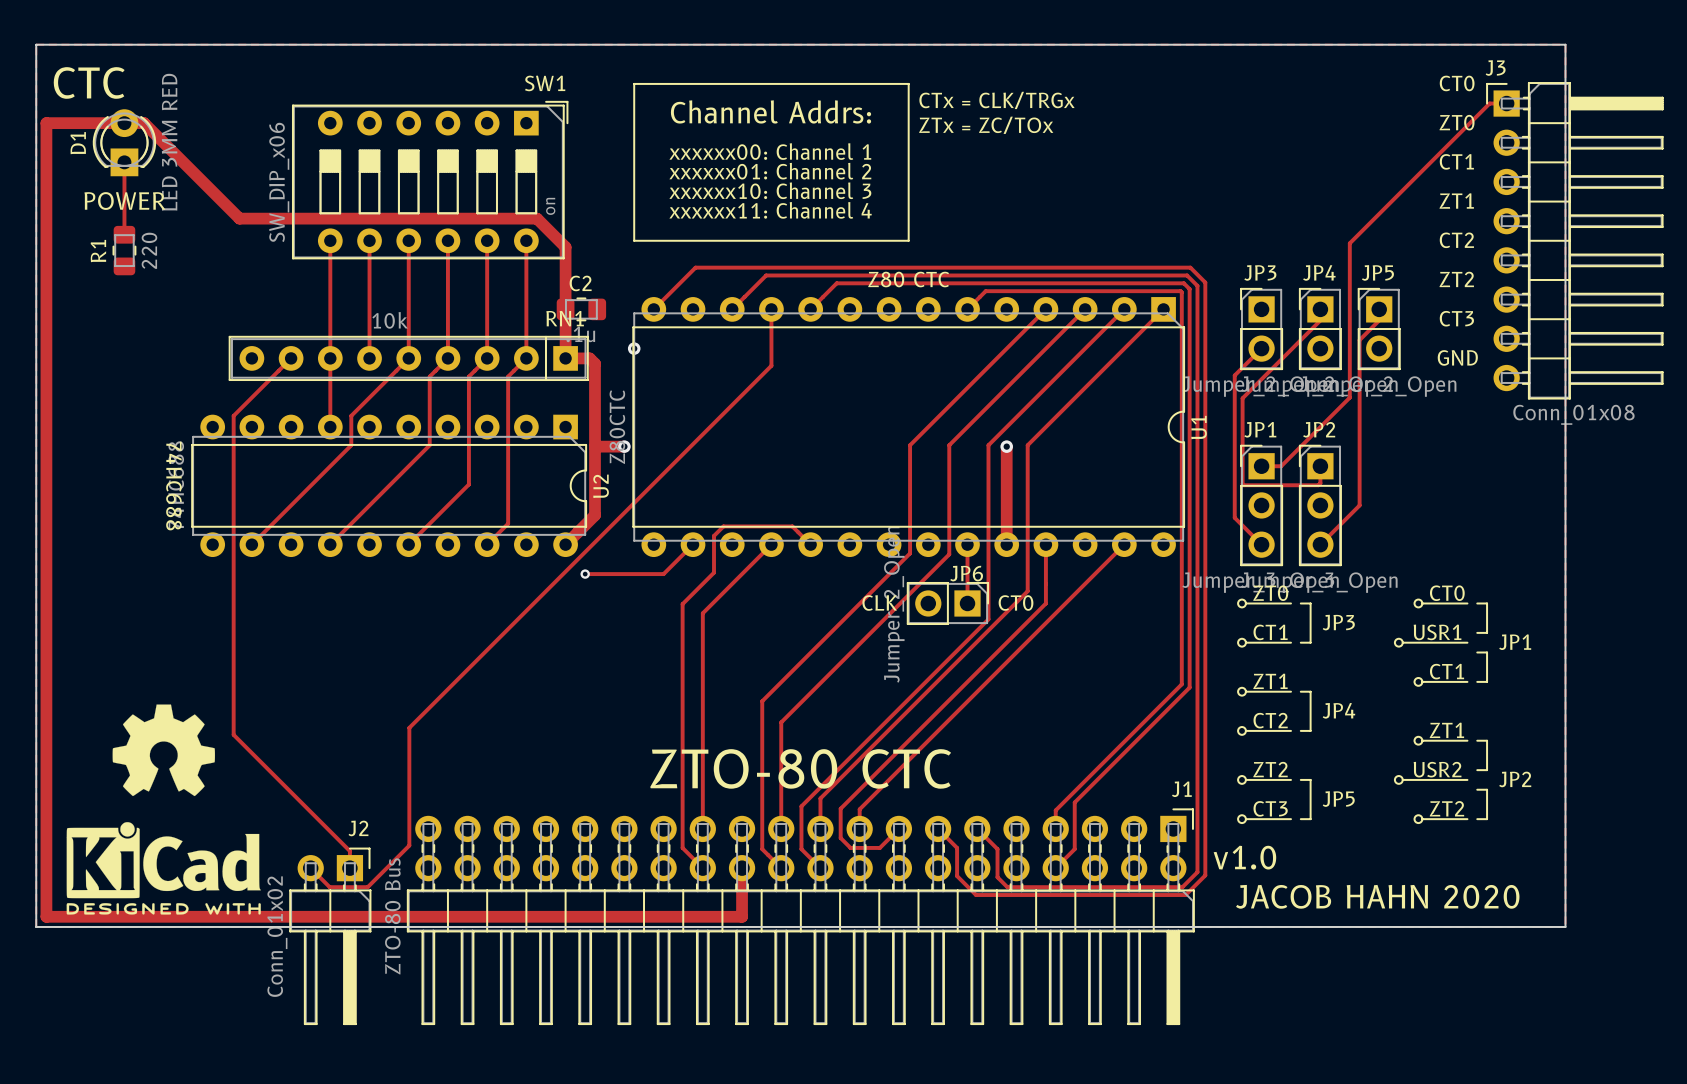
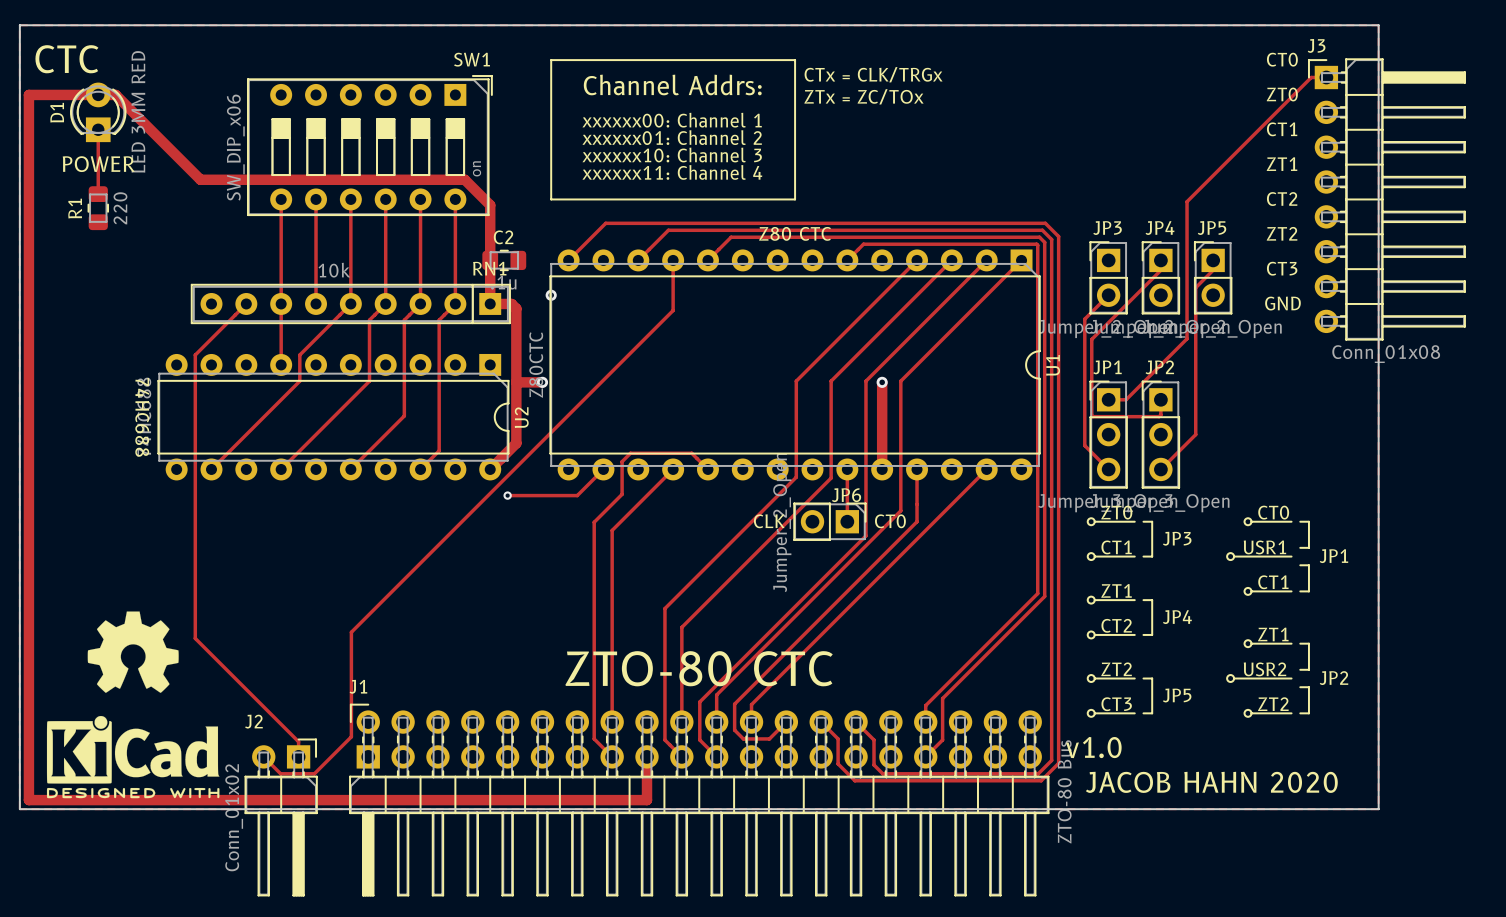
J1 name position: J1 (1181, 789) -> J1 (358, 686)
J1 footprint: [406, 808, 1195, 1026] -> [349, 703, 1050, 897]
J2 name position: J2 (358, 828) -> J2 (253, 721)
J1 value position: ZTO-80 Bus (392, 916) -> ZTO-80 Bus (1064, 791)

